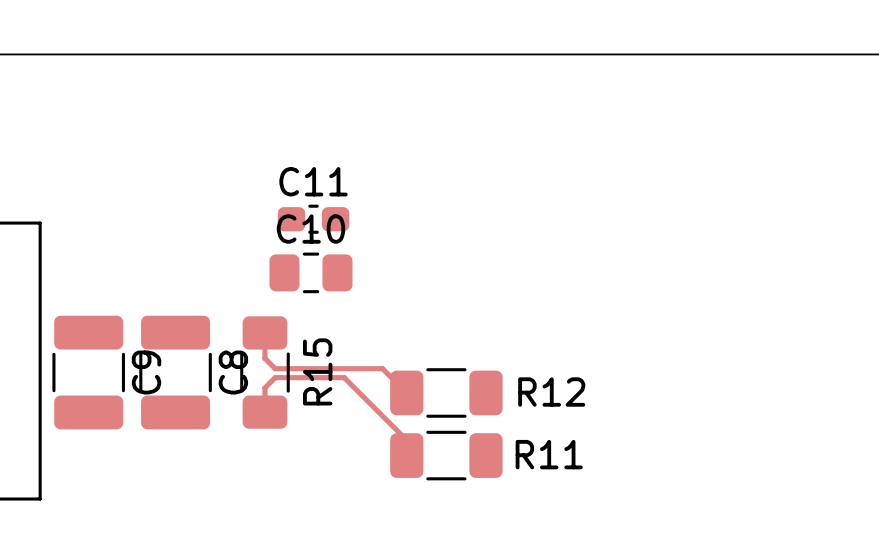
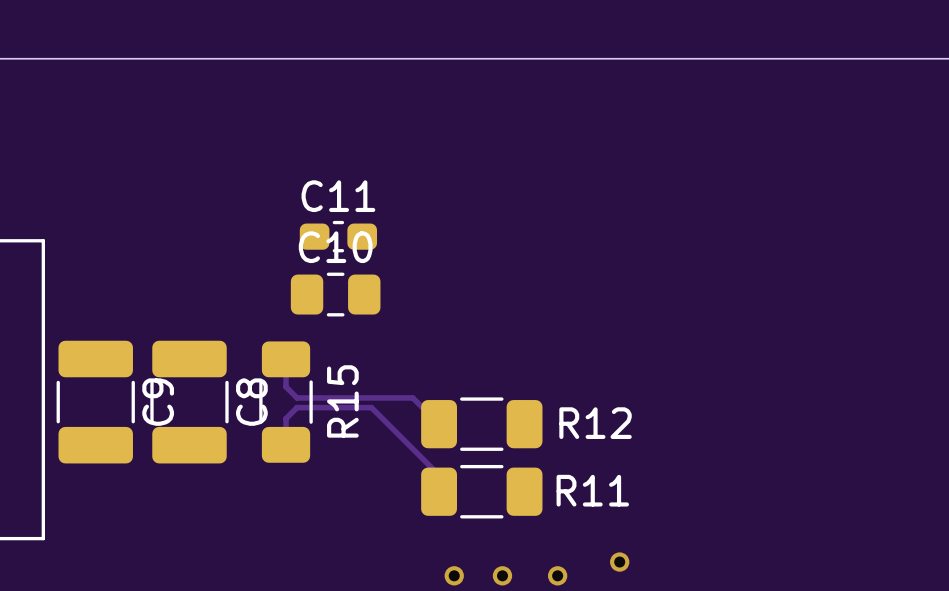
via: none -> (619, 562)
via: none -> (454, 575)
via: none -> (502, 575)
via: none -> (557, 575)

